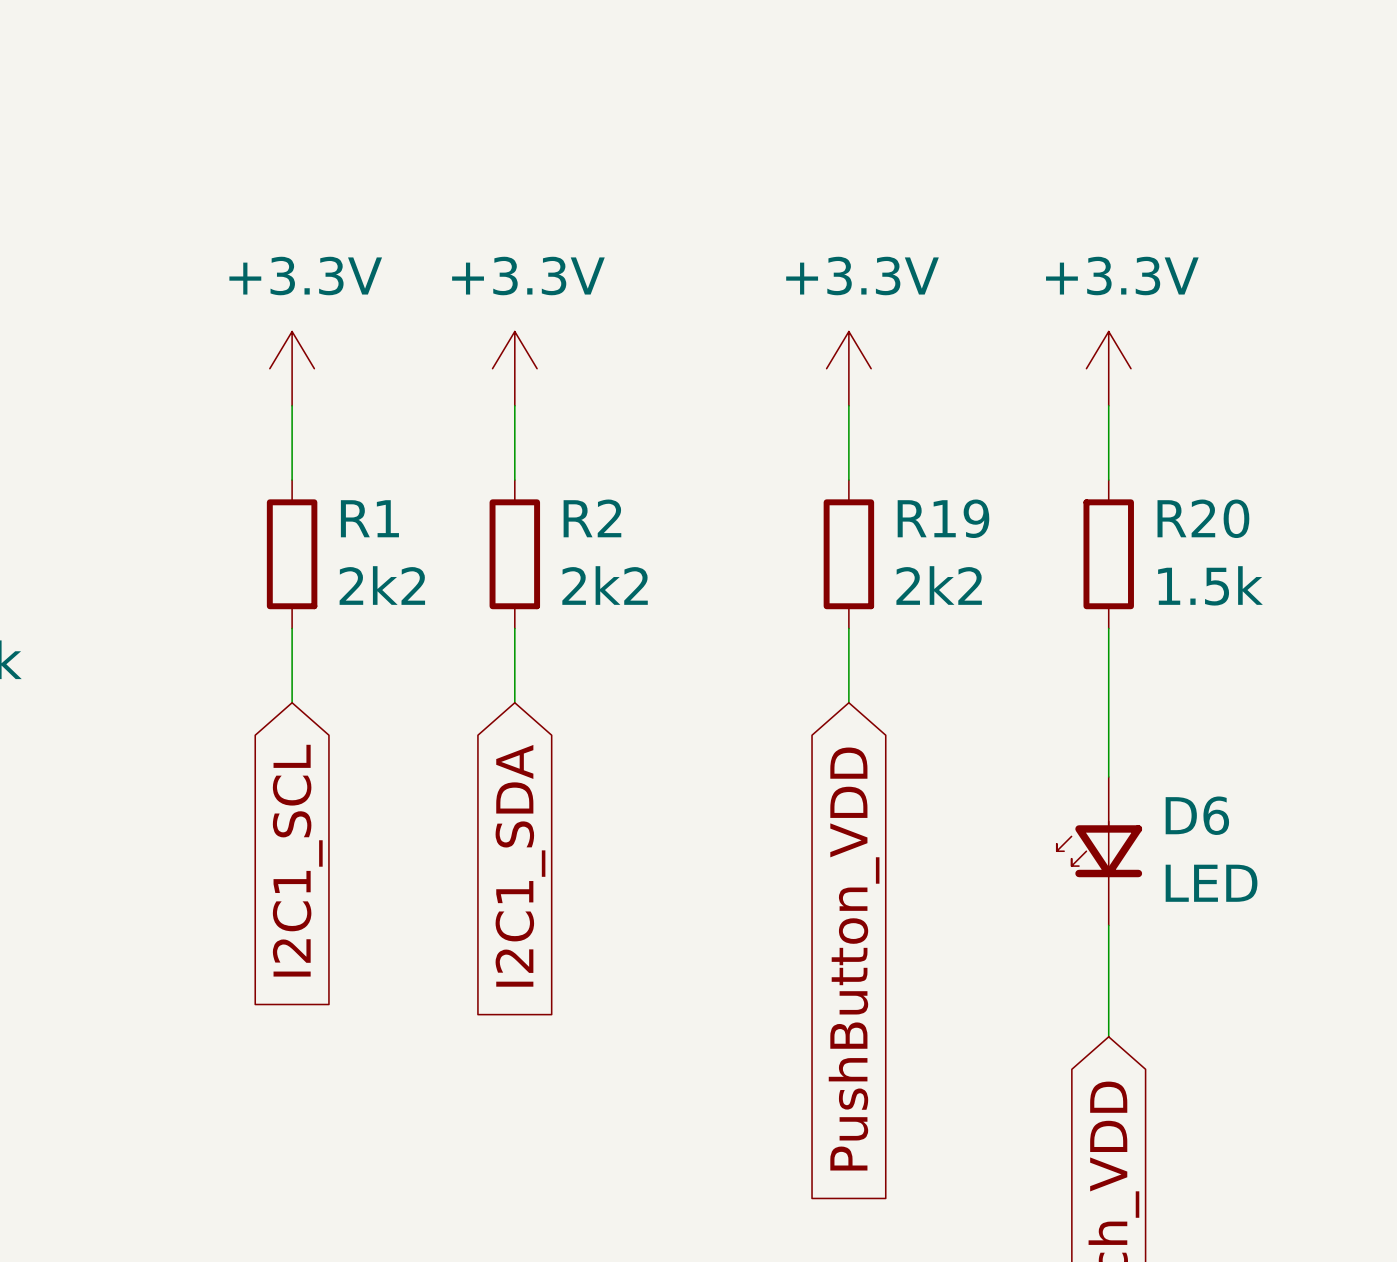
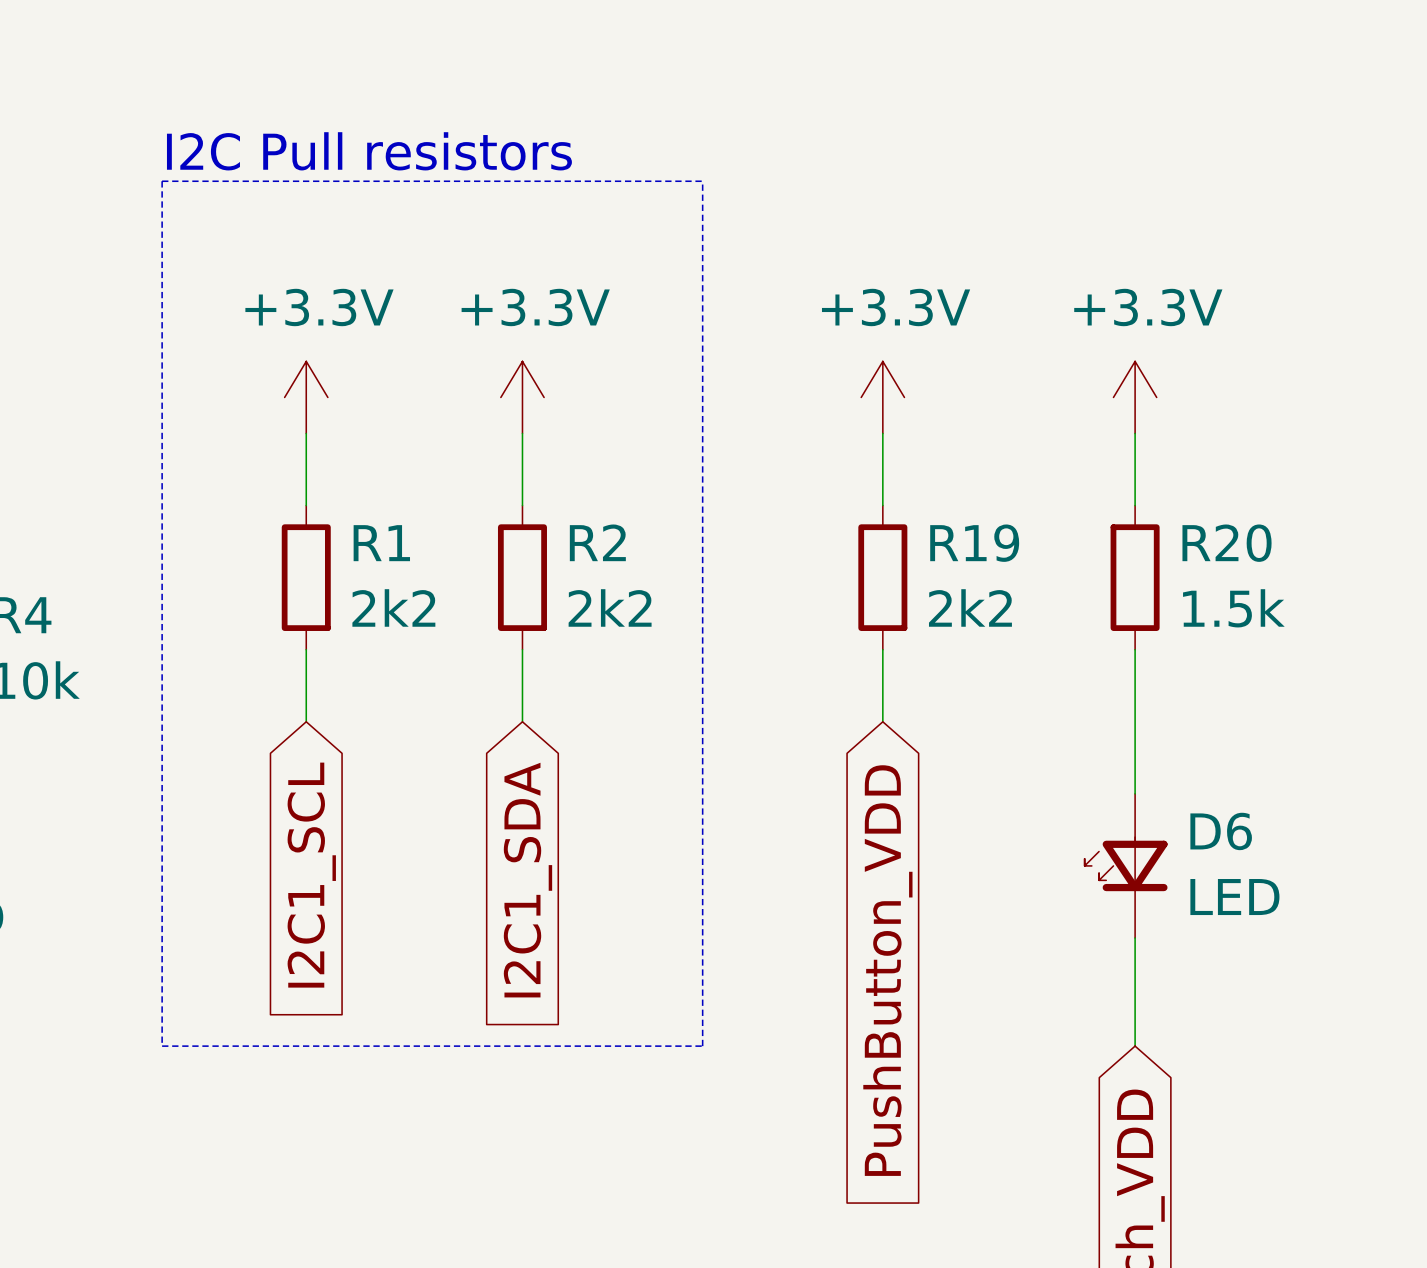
text: none -> I2C Pull resistors (369, 151)
line: none -> (162, 181) (702, 181) (702, 1046) (162, 1046) (162, 181)
power symbol position: +3.3V (292, 368) -> +3.3V (306, 397)
power symbol position: +3.3V (514, 368) -> +3.3V (522, 397)
wire: (292, 405) (292, 480) -> (306, 433) (306, 505)
wire: (514, 405) (514, 480) -> (522, 433) (522, 505)
R1 position: (292, 554) -> (306, 577)
R2 position: (514, 554) -> (522, 577)
wire: (292, 628) (292, 702) -> (306, 649) (306, 721)
wire: (514, 628) (514, 702) -> (522, 649) (522, 721)
global label position: I2C1_SCL (297, 860) -> I2C1_SCL (311, 875)
global label position: I2C1_SDA (520, 865) -> I2C1_SDA (527, 880)

